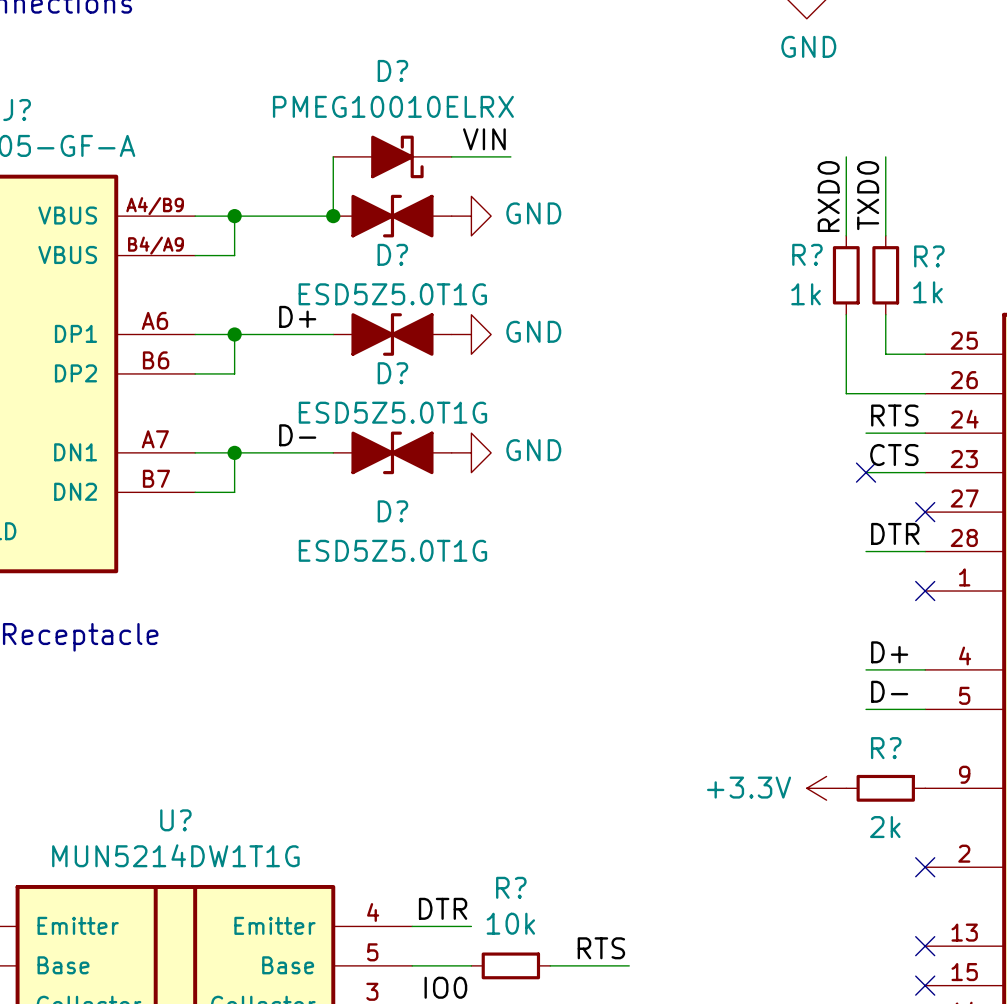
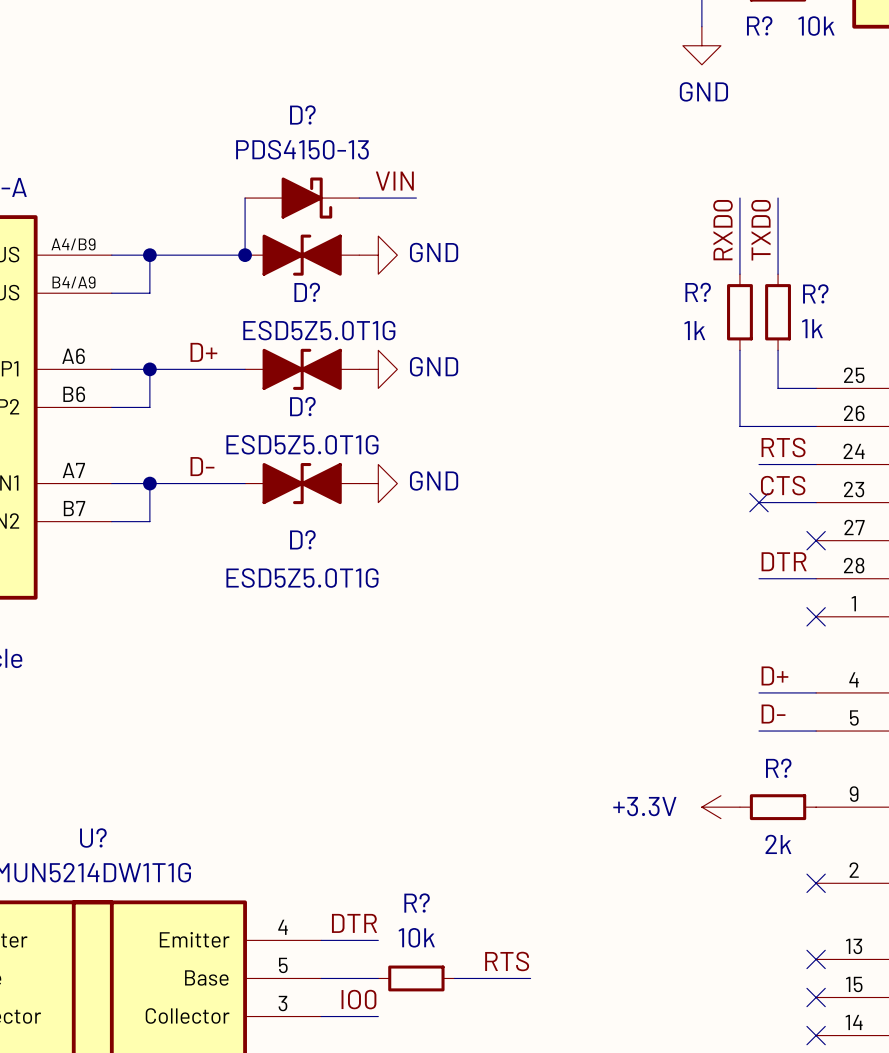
D? value: PMEG10010ELRX (393, 106) -> PDS4150-13 (302, 149)

